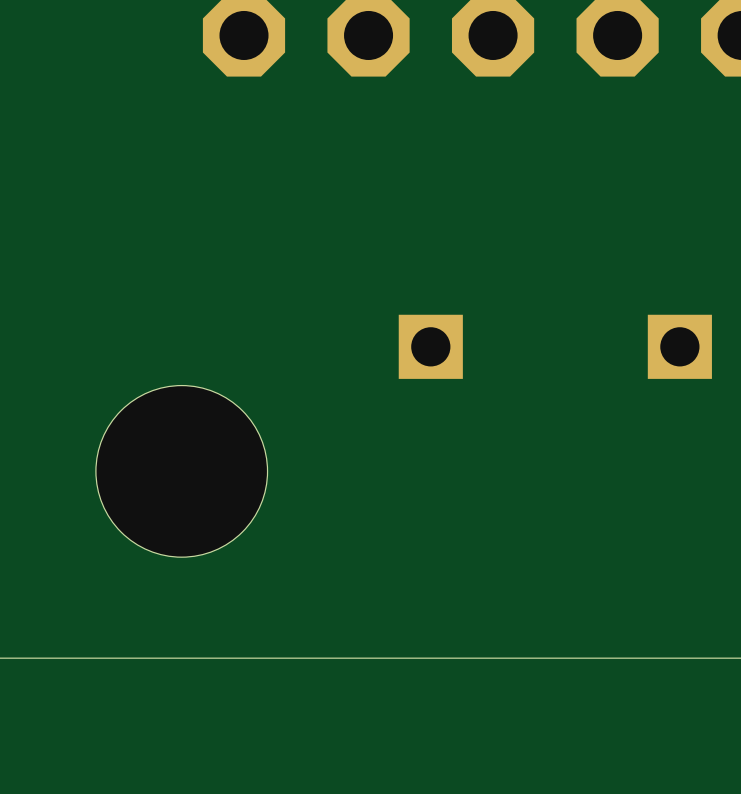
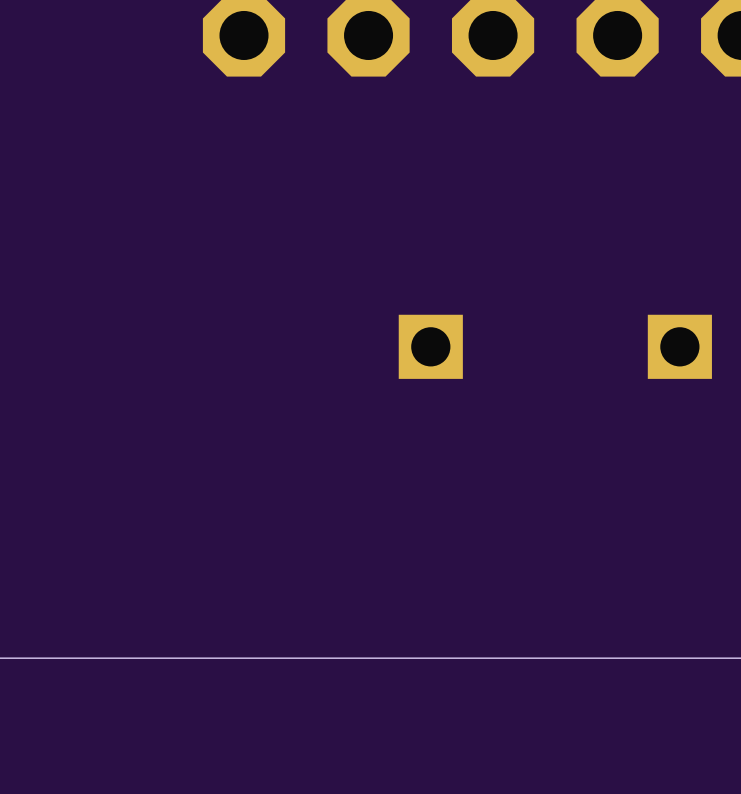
hole: (181, 471) -> none

